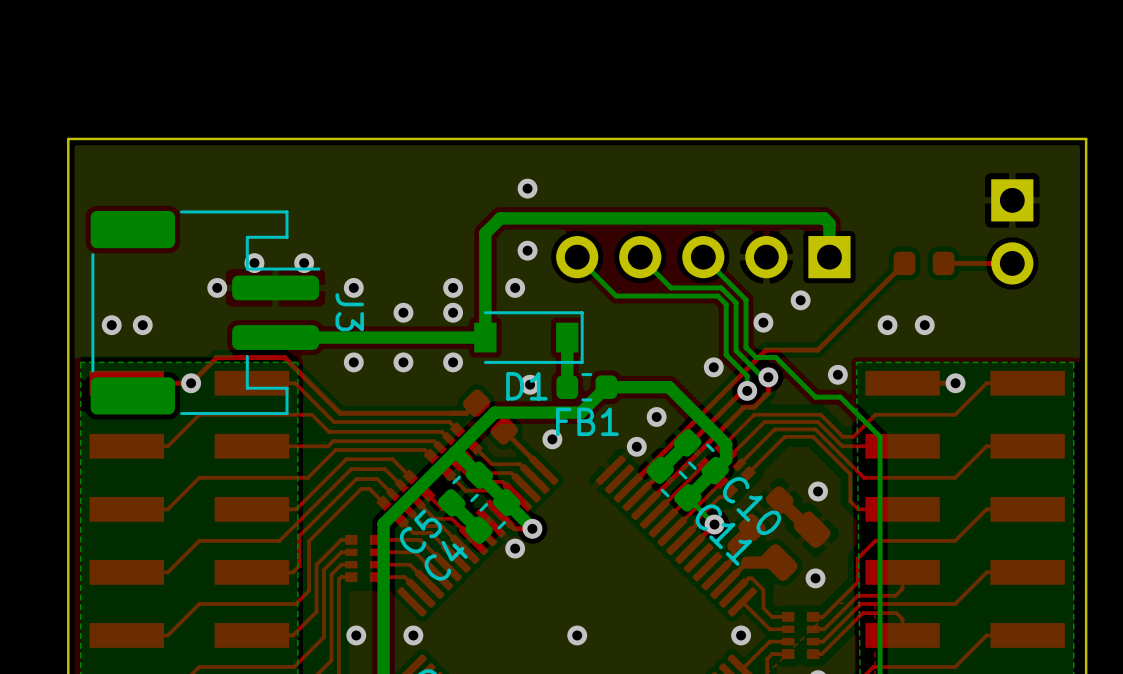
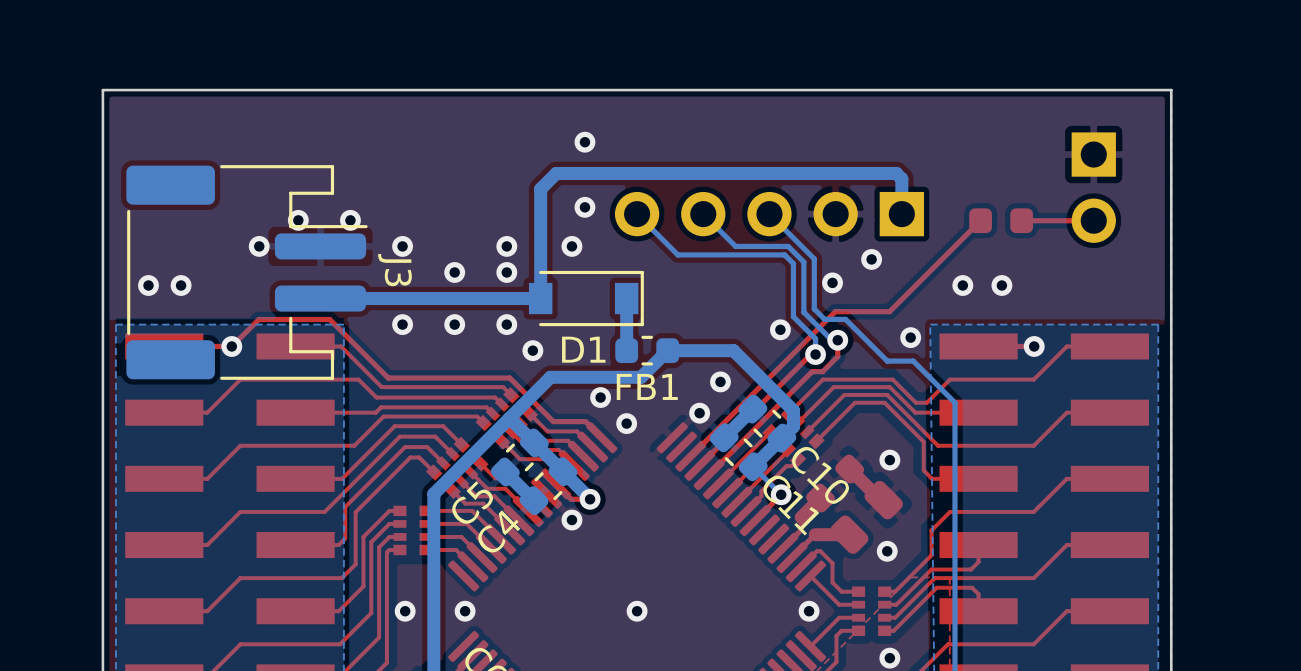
via: (530, 384) -> none
via: none -> (532, 350)
top track: (476, 403) (466, 413) (455, 413) -> none
part: (490, 417) -> none
top track: (504, 430) (528, 454) -> (509, 378) (553, 421) (585, 421)
via: none -> (600, 397)
via: (552, 439) -> none
via: none -> (626, 423)

